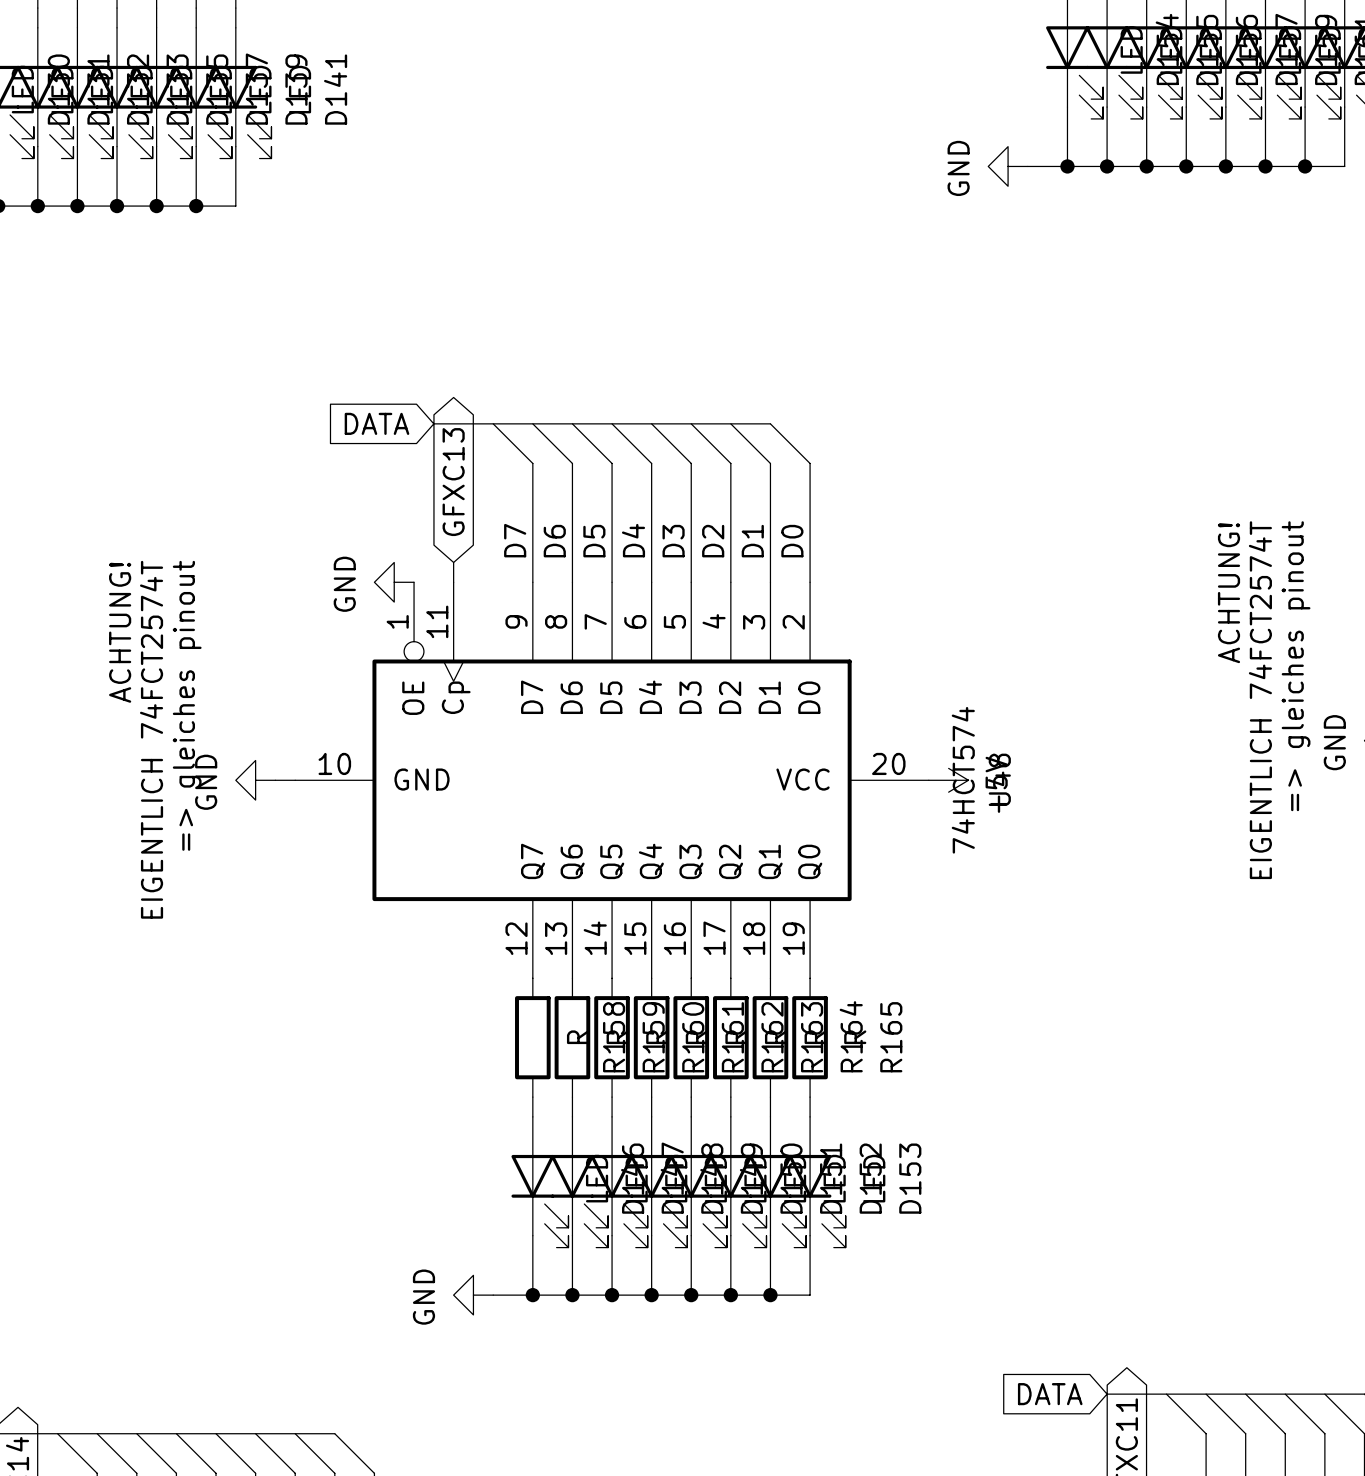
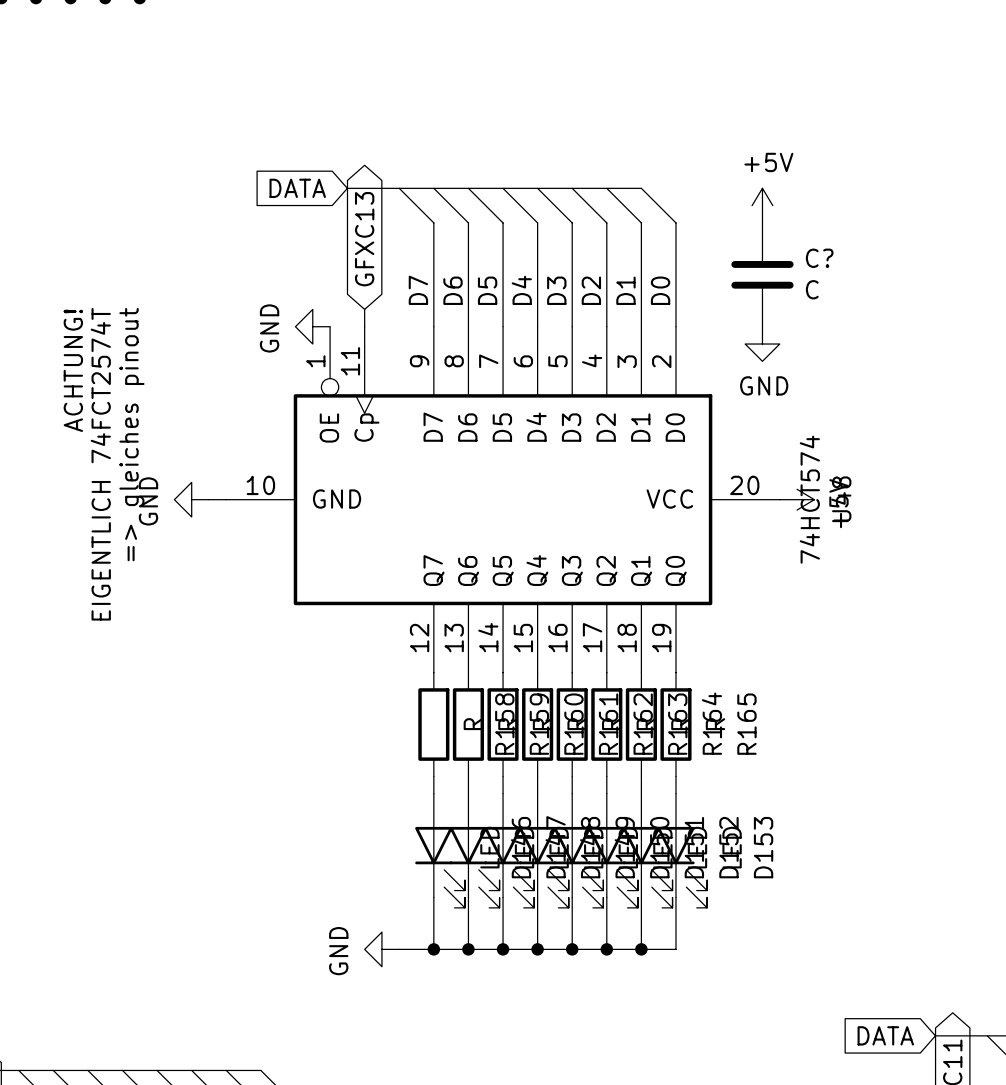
power symbol: none -> +5V (762, 205)
C?: none -> C (762, 274)
power symbol: none -> GND (762, 344)

